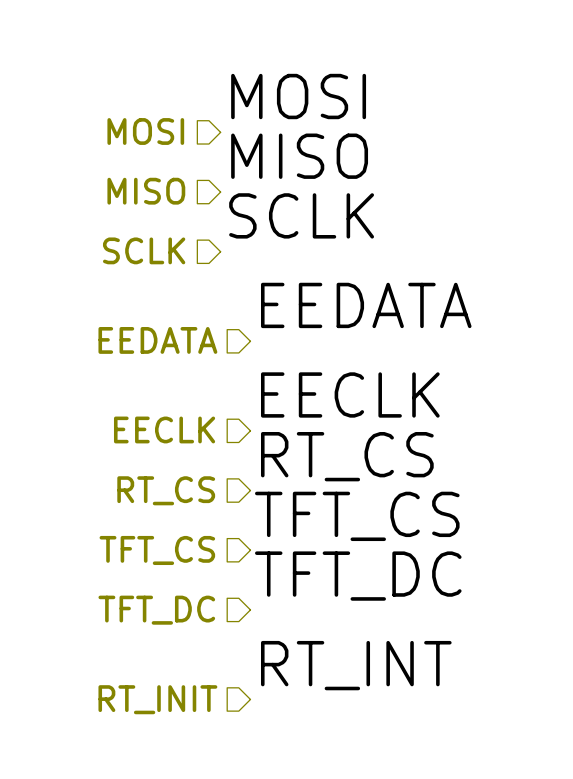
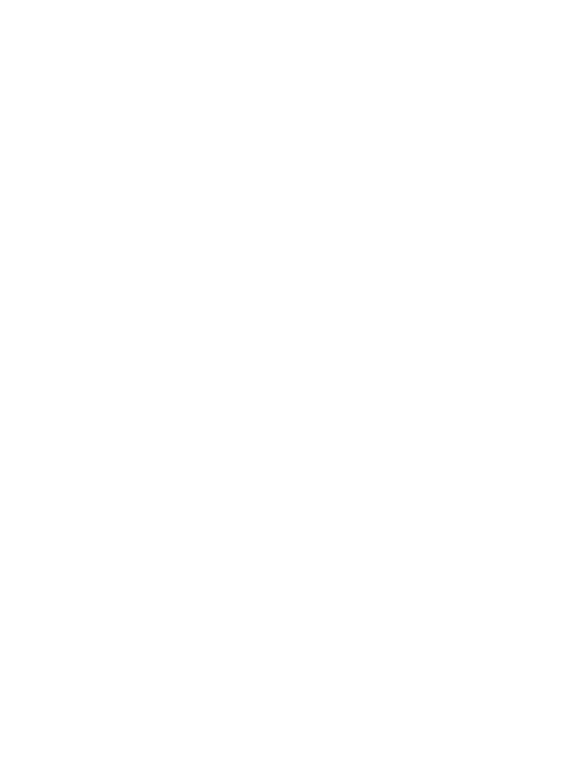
label: MOSI (298, 96) -> none
hierarchical label: MOSI (145, 131) -> none
label: MISO (299, 156) -> none
hierarchical label: MISO (146, 191) -> none
label: SCLK (301, 215) -> none
hierarchical label: SCLK (144, 250) -> none
label: EEDATA (366, 305) -> none
hierarchical label: EEDATA (157, 340) -> none
label: EECLK (350, 394) -> none
hierarchical label: EECLK (164, 429) -> none
label: RT_CS (347, 456) -> none
hierarchical label: RT_CS (166, 490) -> none
label: TFT_CS (357, 516) -> none
hierarchical label: TFT_CS (157, 550) -> none
label: TFT_DC (358, 576) -> none
hierarchical label: TFT_DC (156, 610) -> none
label: RT_INT (356, 665) -> none
hierarchical label: RT_INIT (157, 699) -> none

